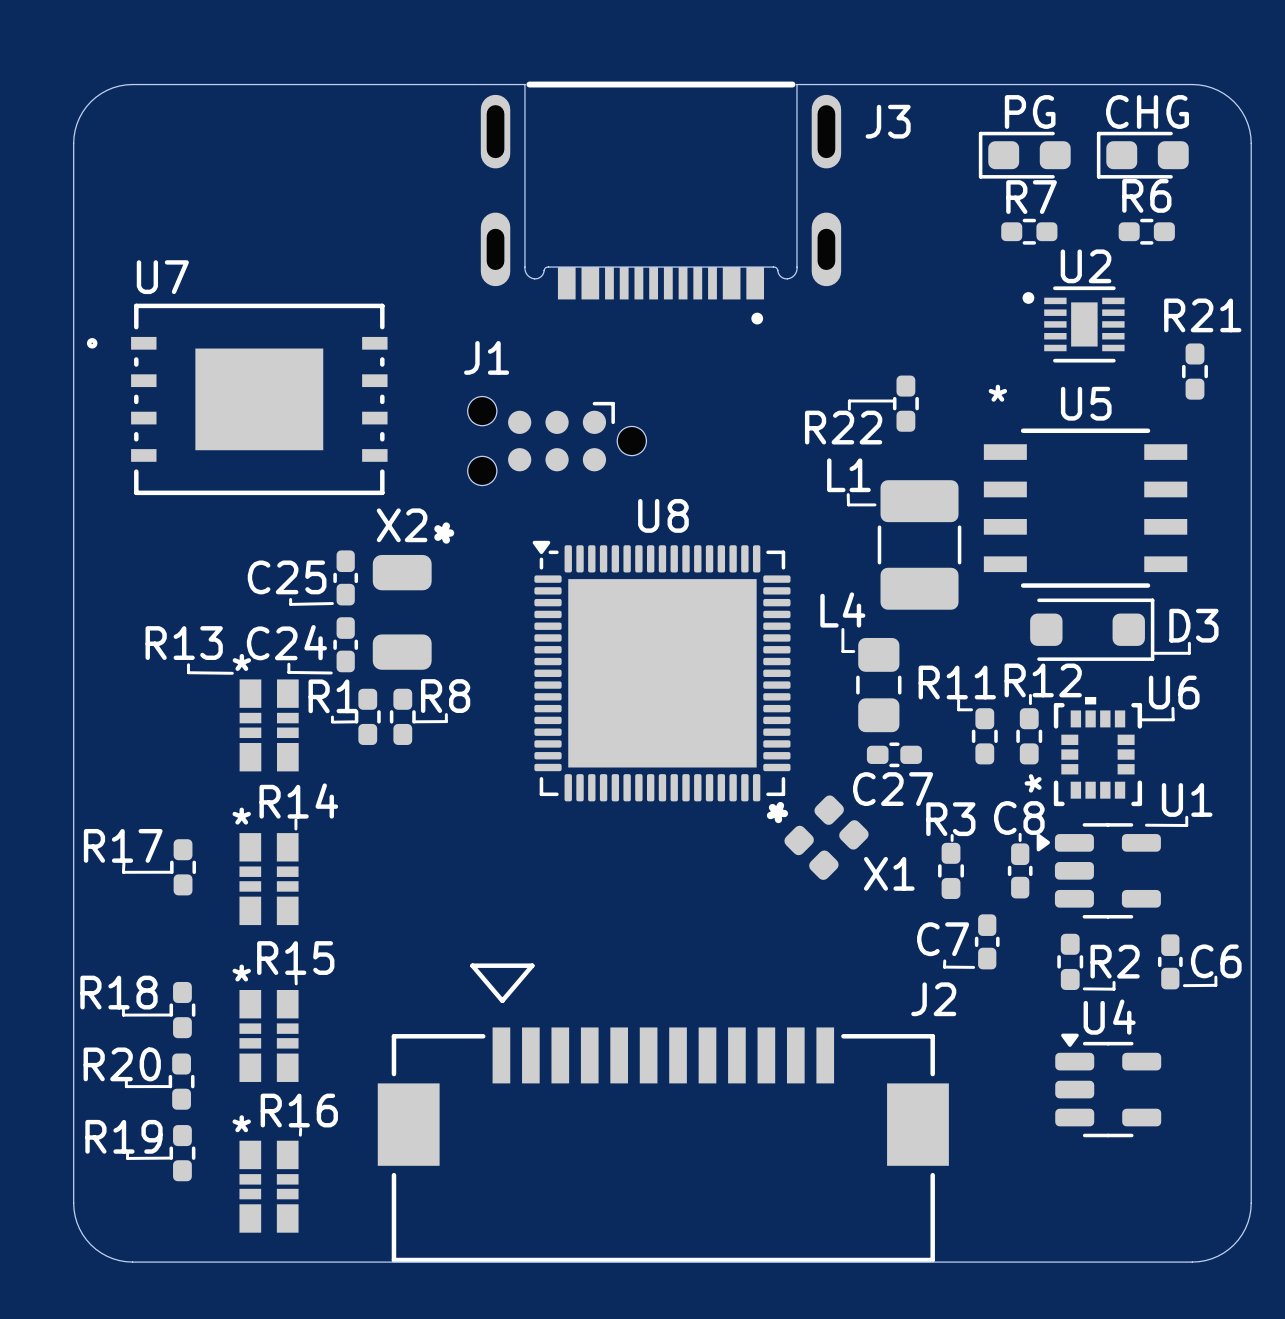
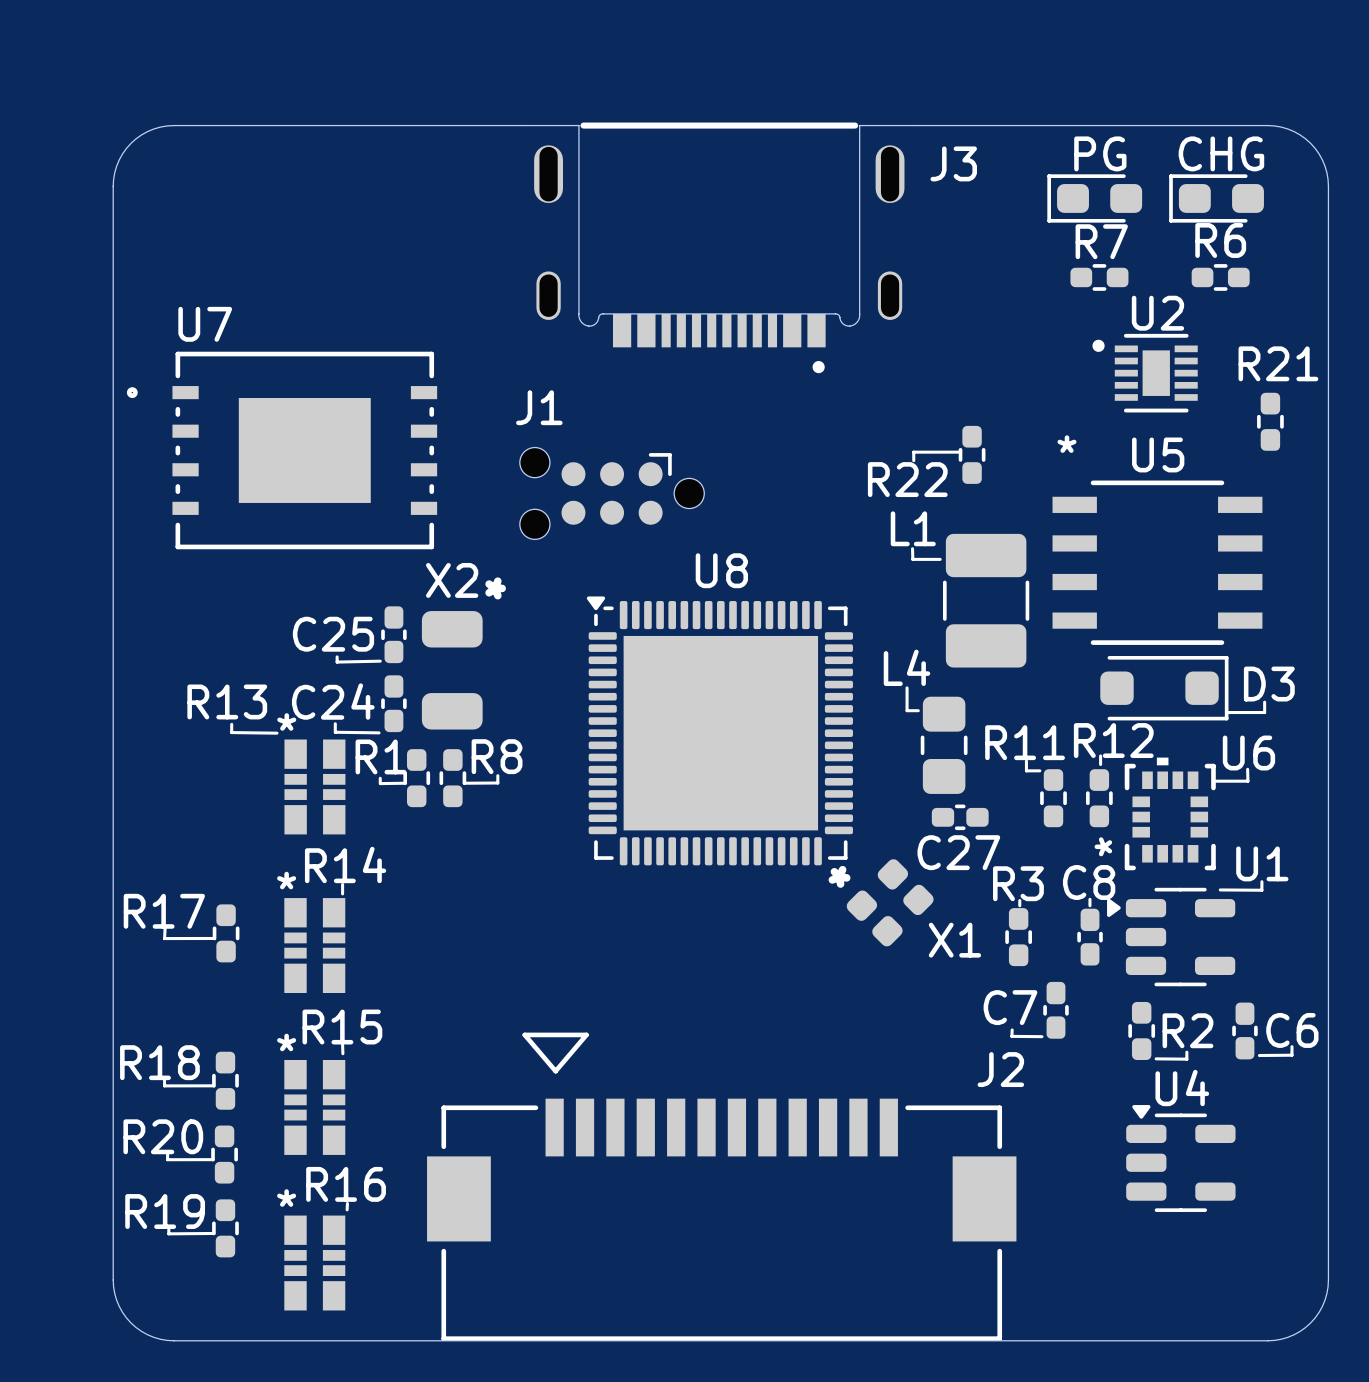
J3 footprint: [473, 81, 854, 325] -> [525, 122, 918, 374]

